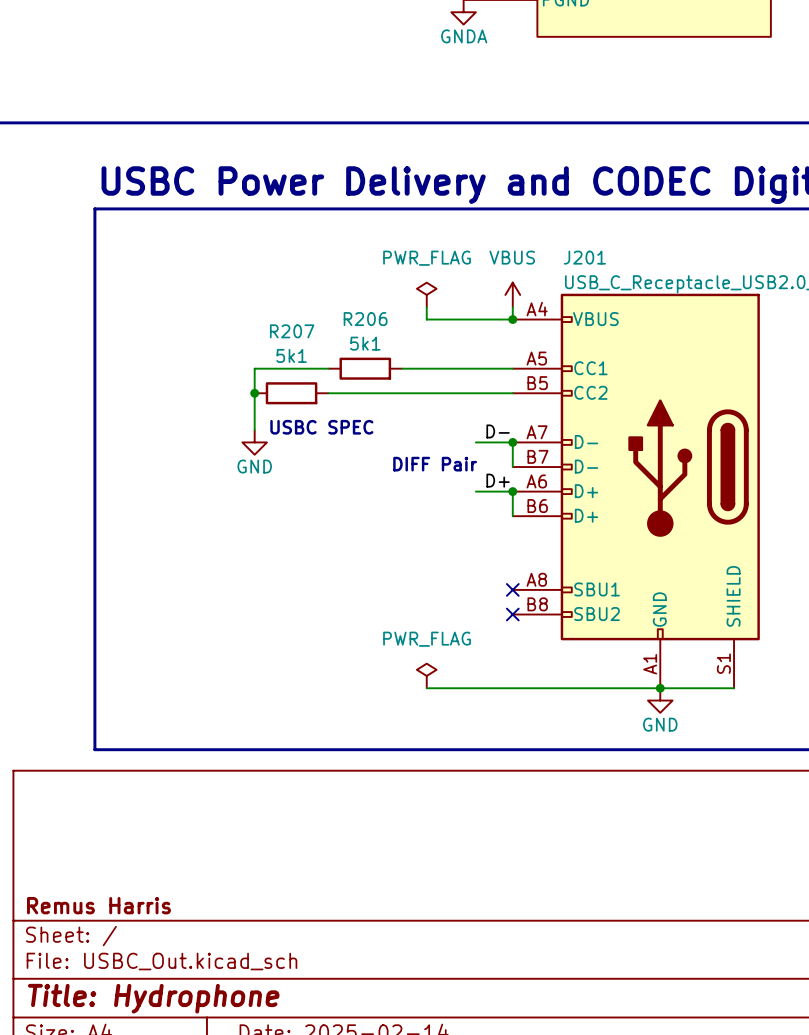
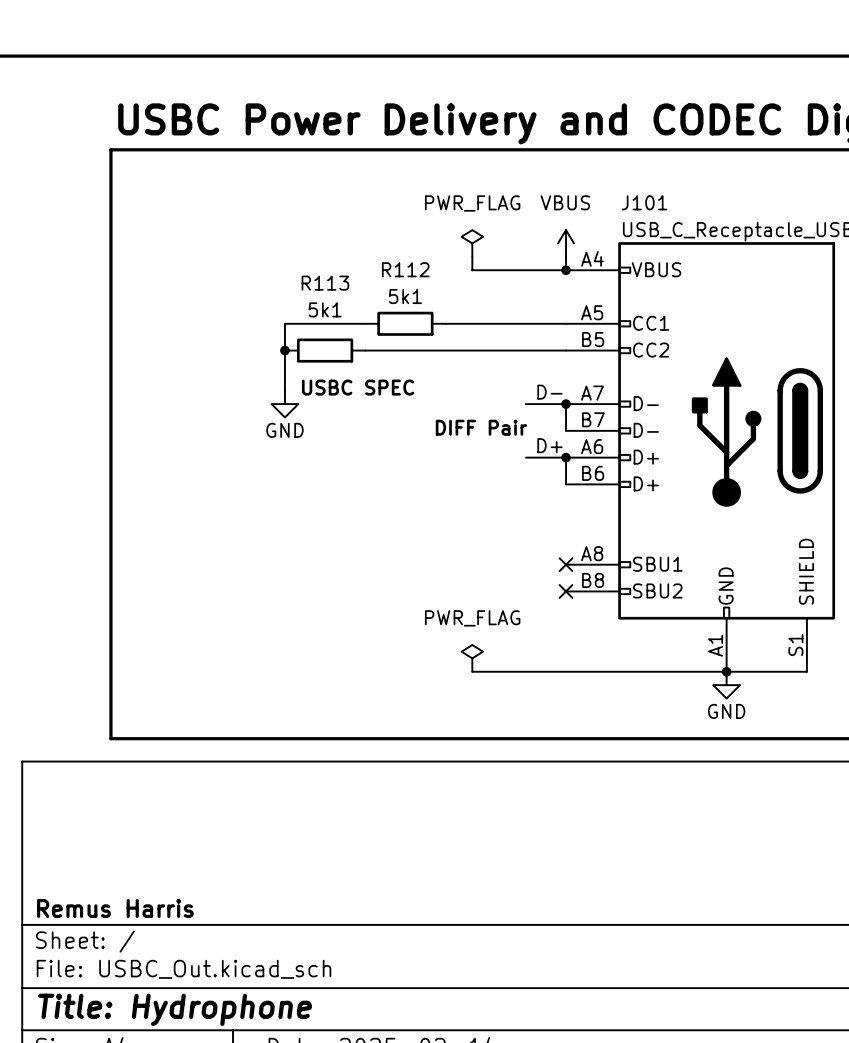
J201 name: J201 (584, 257) -> J101 (644, 202)
R206 name: R206 (365, 319) -> R112 (405, 269)
R207 name: R207 (292, 331) -> R113 (325, 283)

